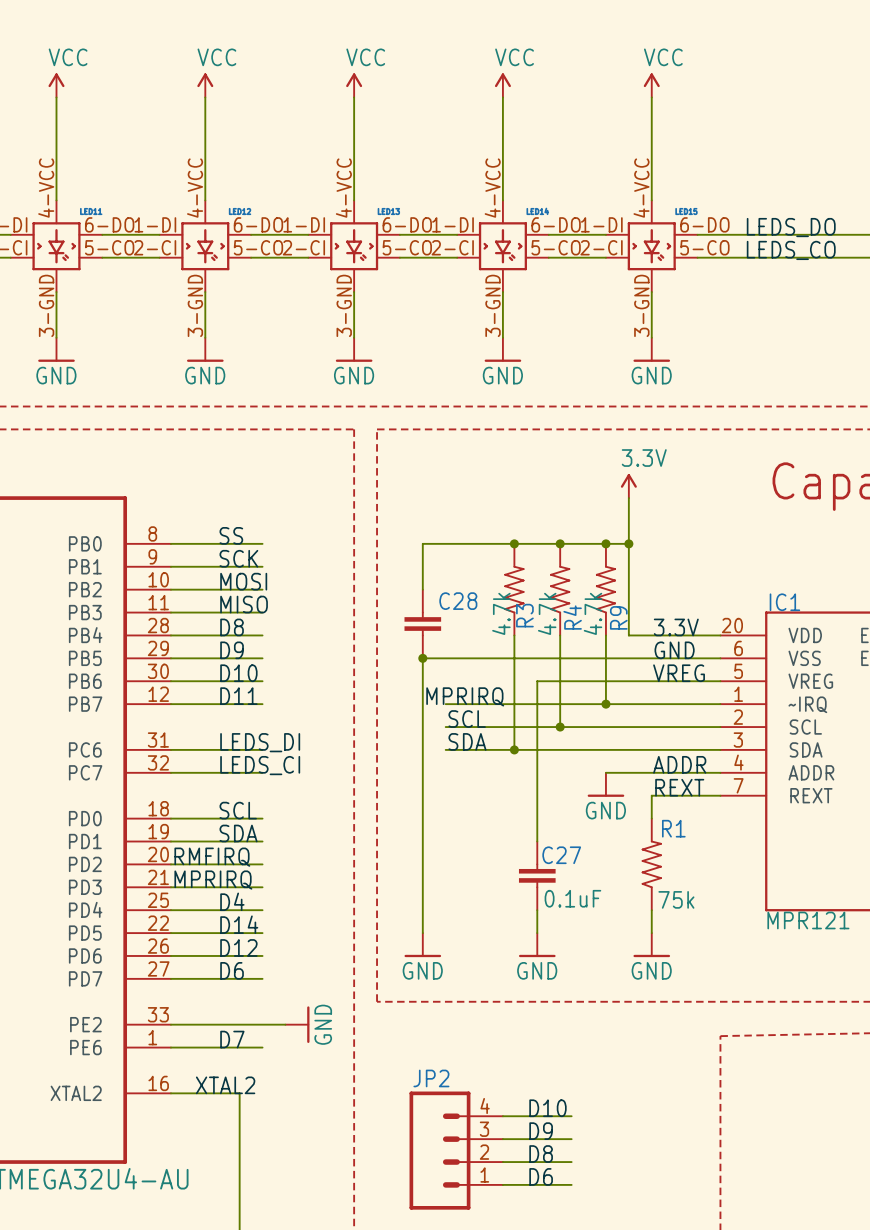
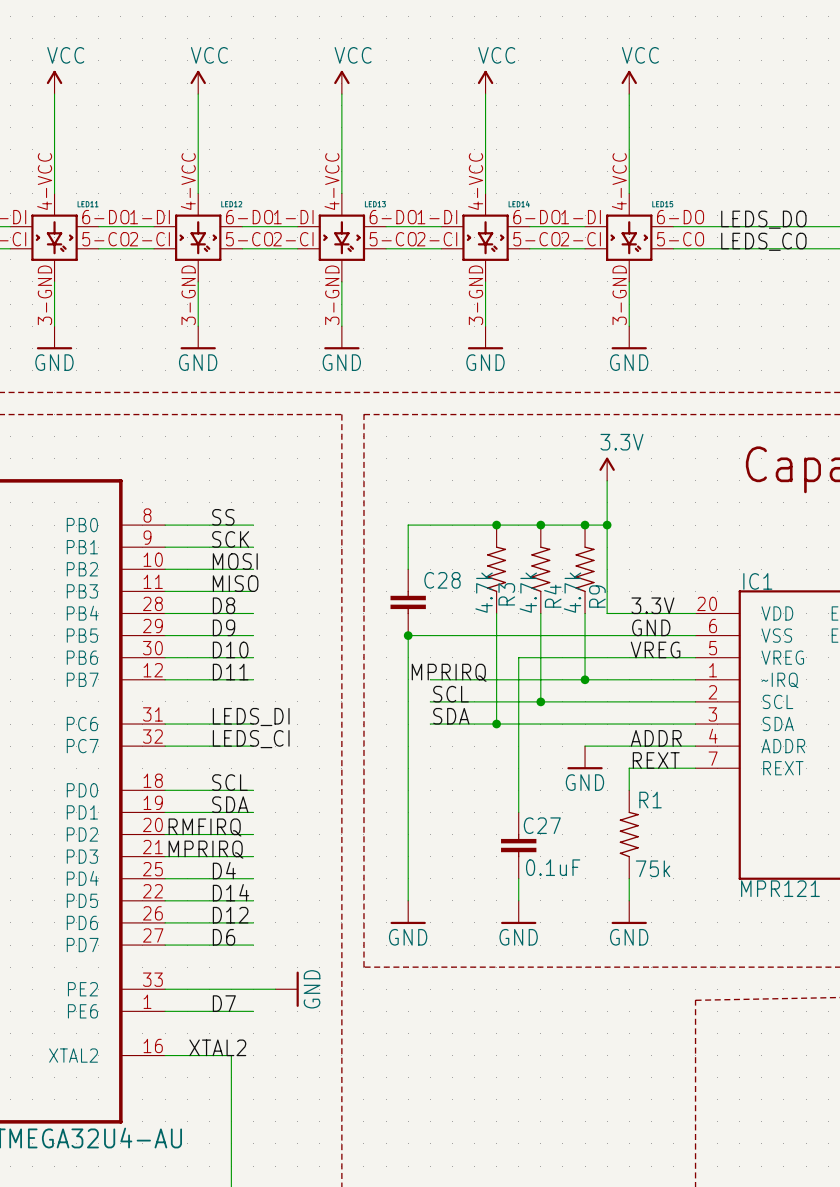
label: D10 (547, 1108) -> none
wire: (502, 1116) (571, 1116) -> none
label: D9 (541, 1131) -> none
wire: (502, 1139) (571, 1139) -> none
JP2: (456, 1150) -> none
label: D8 (541, 1154) -> none
wire: (502, 1162) (571, 1162) -> none
label: D6 (541, 1176) -> none
wire: (502, 1184) (571, 1184) -> none

